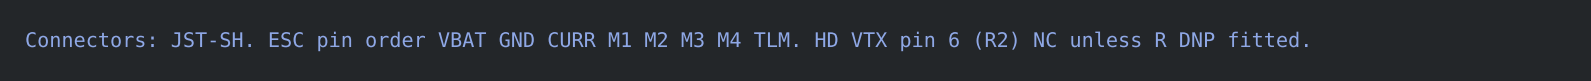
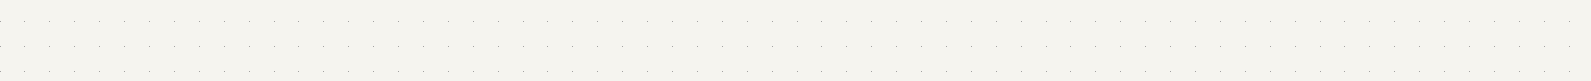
text: Connectors: JST-SH. ESC pin order VBAT GND CURR M1 M2 M3 M4 TLM. HD VTX pin 6 (R2) NC unless R DNP fitted. (666, 41) -> none

